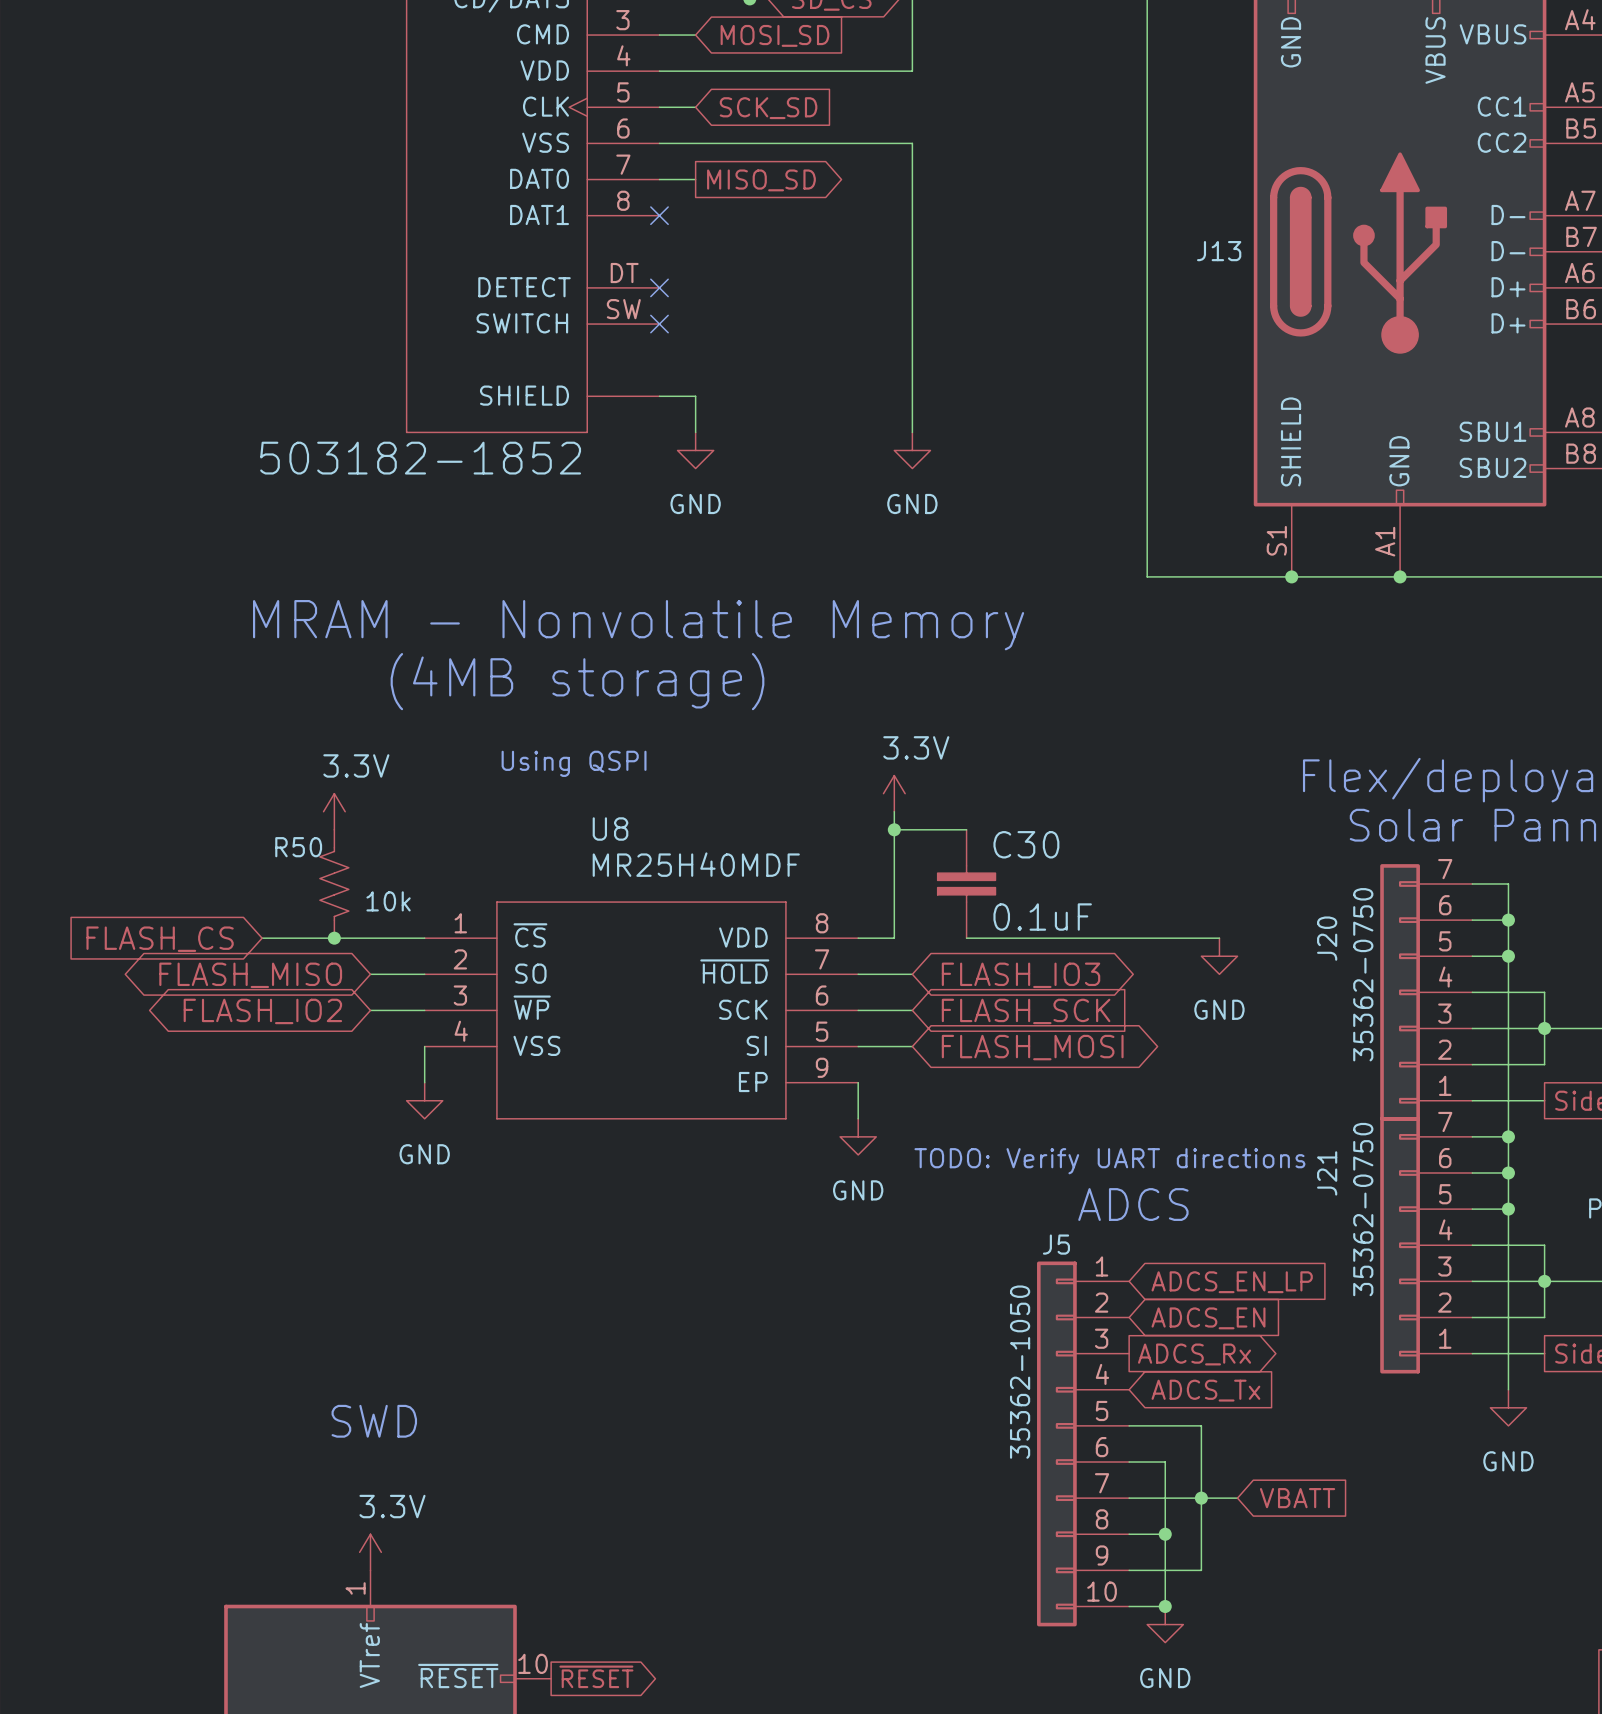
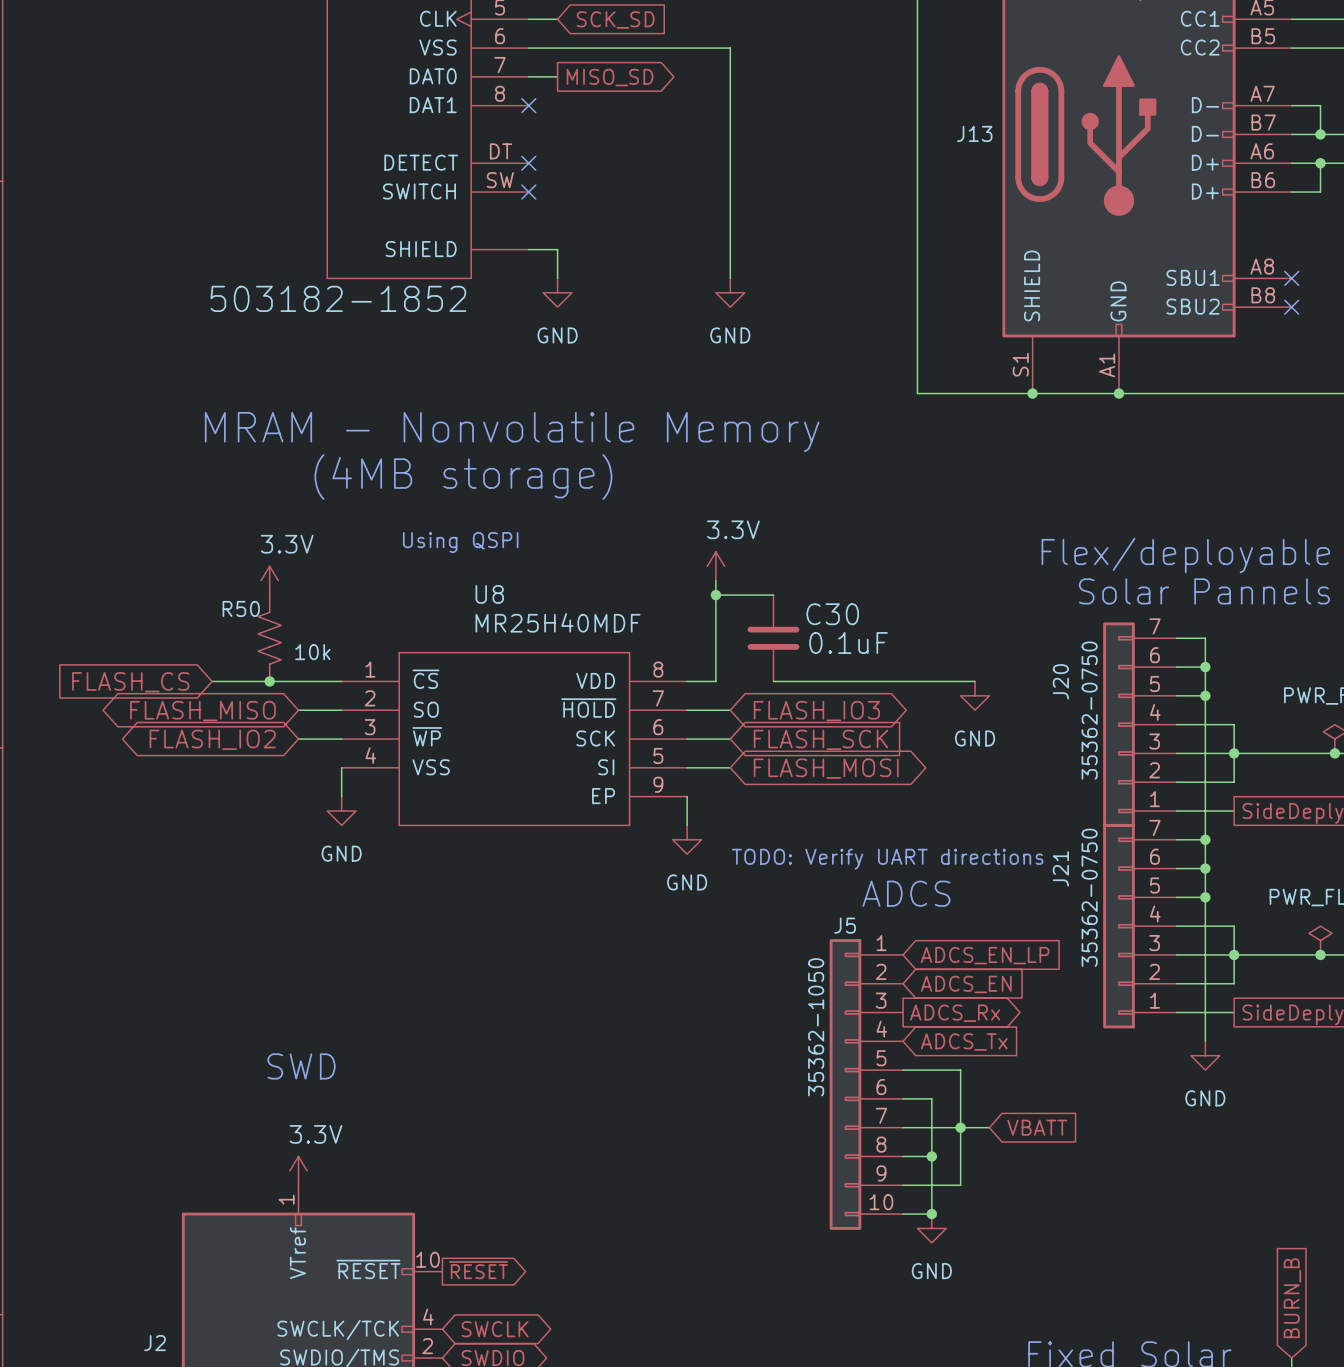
C30 symbol: [937, 829, 996, 939] -> [747, 595, 800, 682]
C30 name position: C30 (1026, 844) -> C30 (832, 614)
C30 value position: 0.1uF (1042, 917) -> 0.1uF (848, 643)

